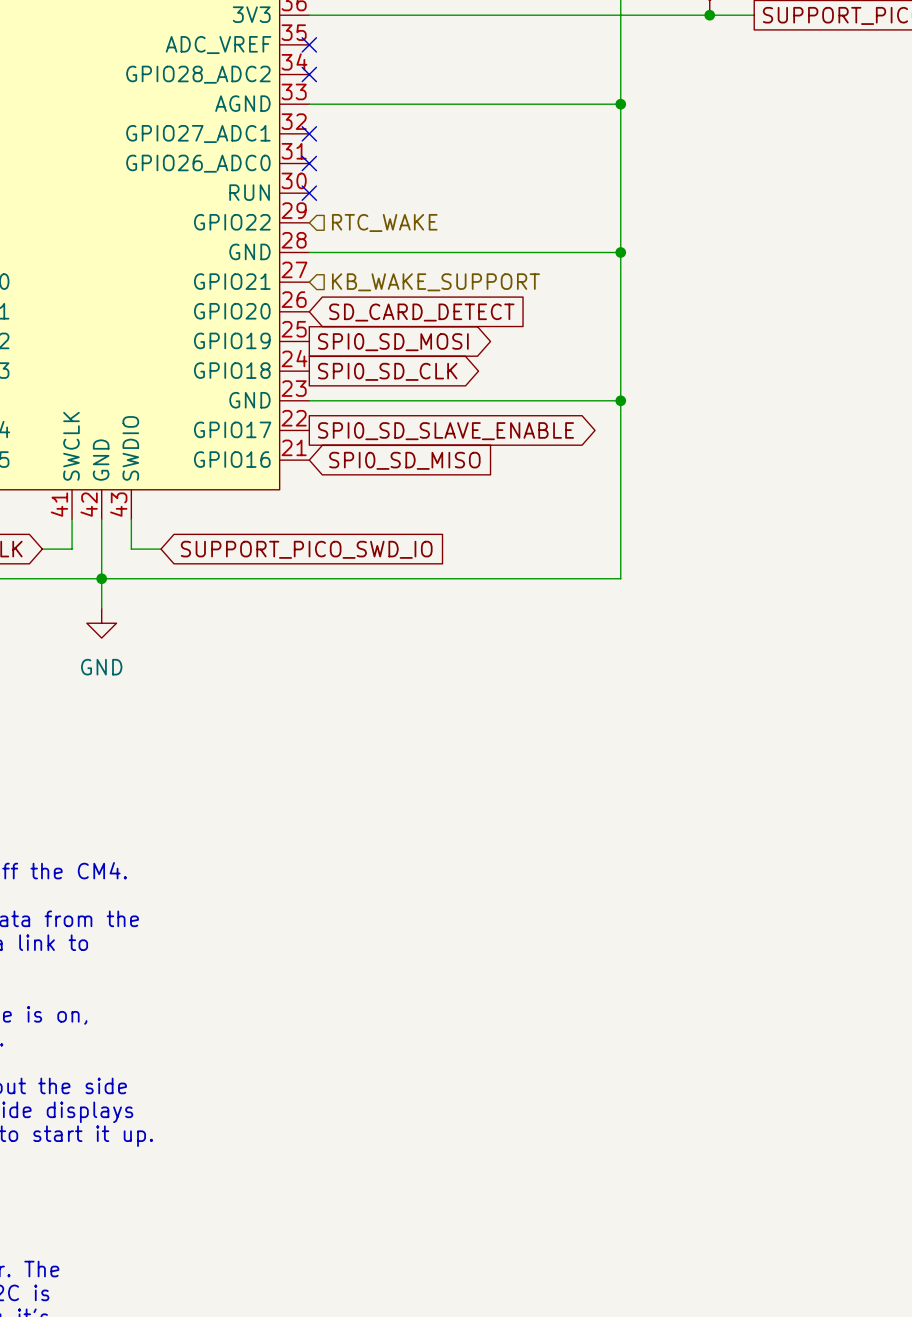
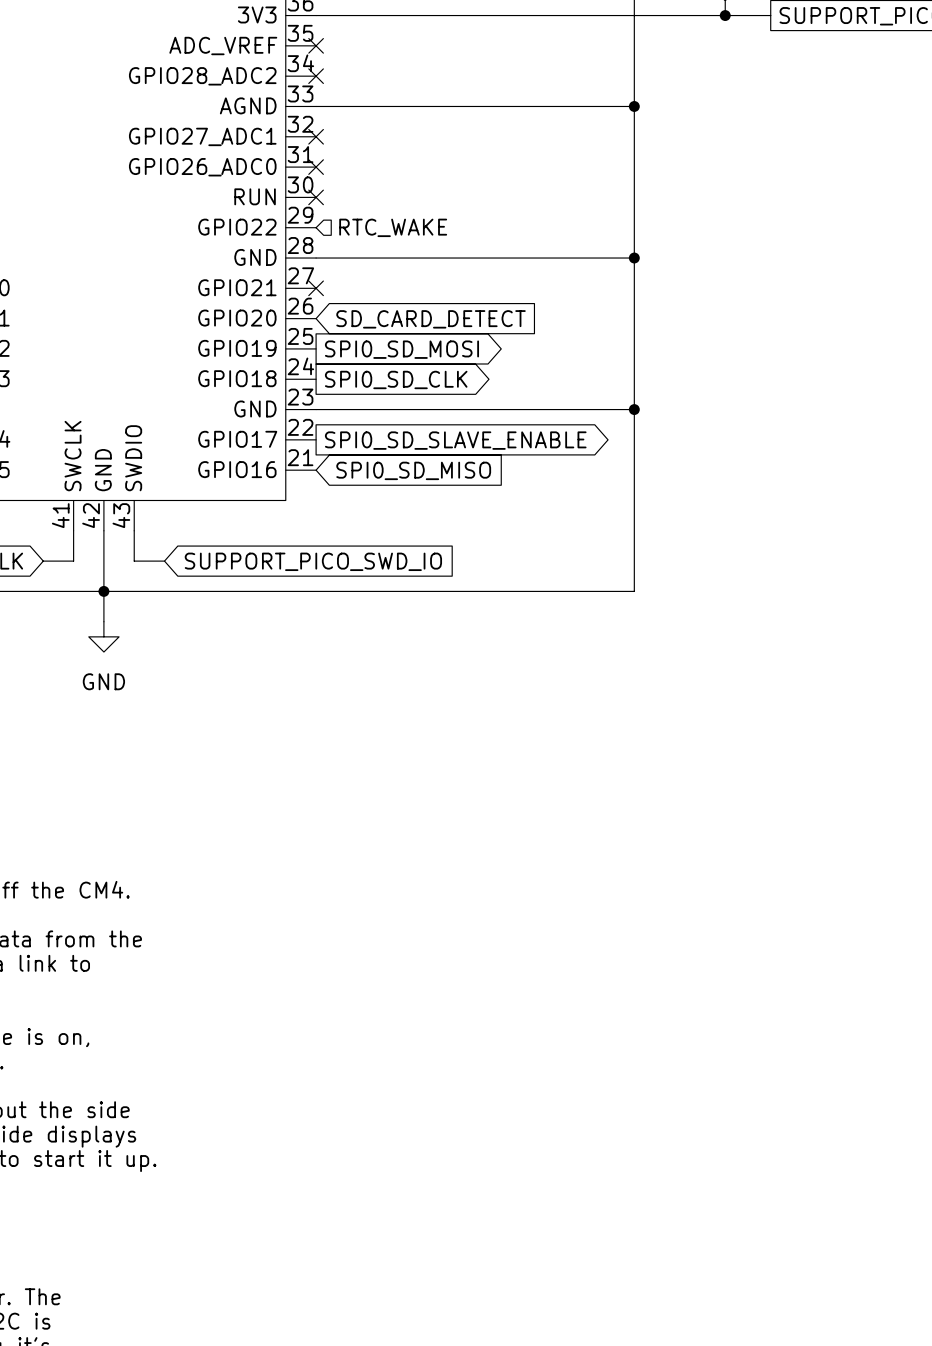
no-connect mark: none -> (316, 288)
hierarchical label: KB_WAKE_SUPPORT (435, 282) -> none

